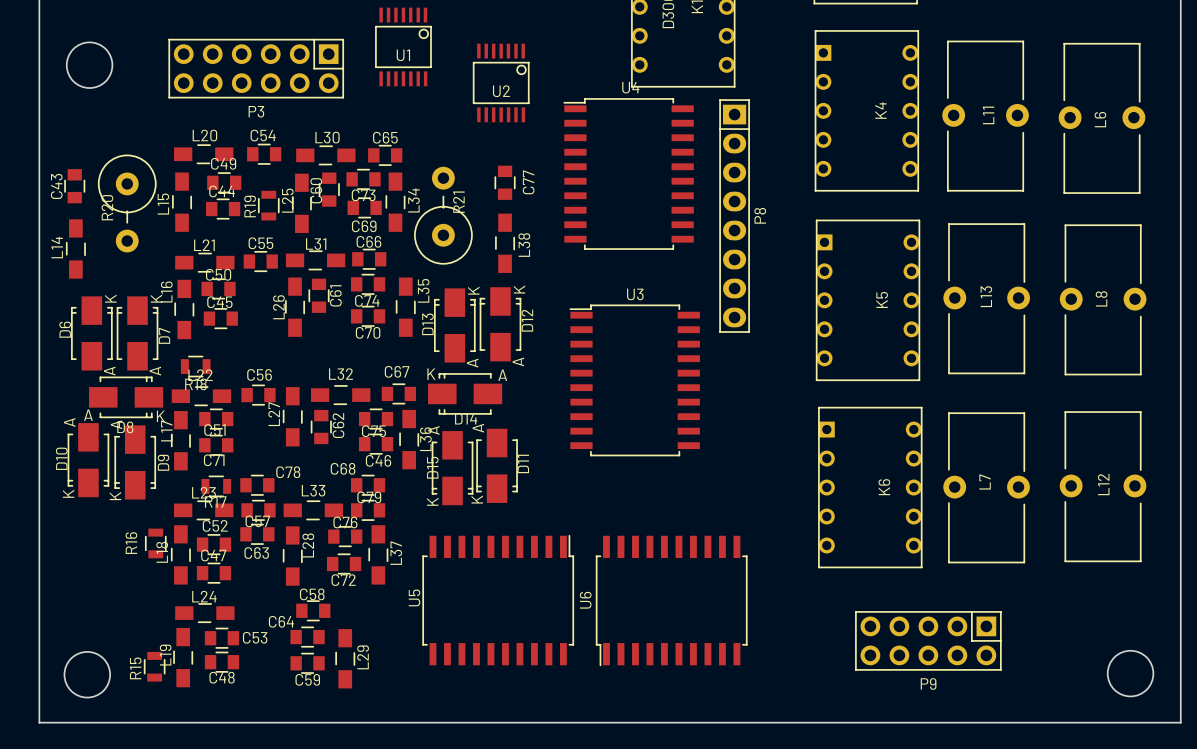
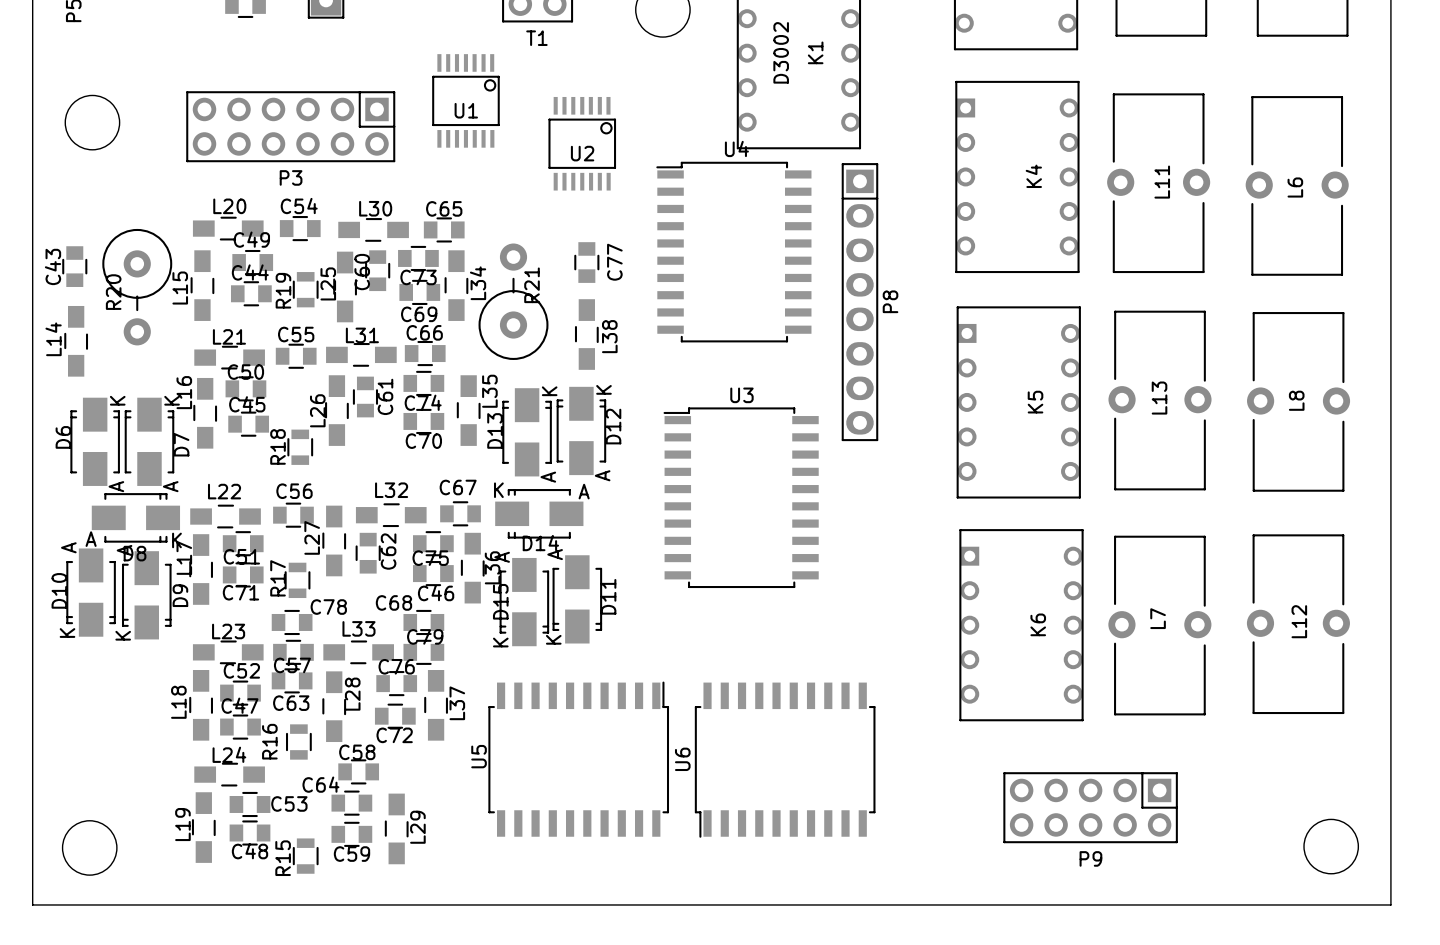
R18 rotation: 0° (195, 366) -> 90° clockwise (300, 447)
R18 position: (195, 366) -> (300, 447)
R17 rotation: 0° (216, 486) -> 90° clockwise (297, 580)
R17 position: (216, 486) -> (297, 580)
R16 position: (155, 543) -> (298, 742)
R15 position: (154, 666) -> (305, 856)

